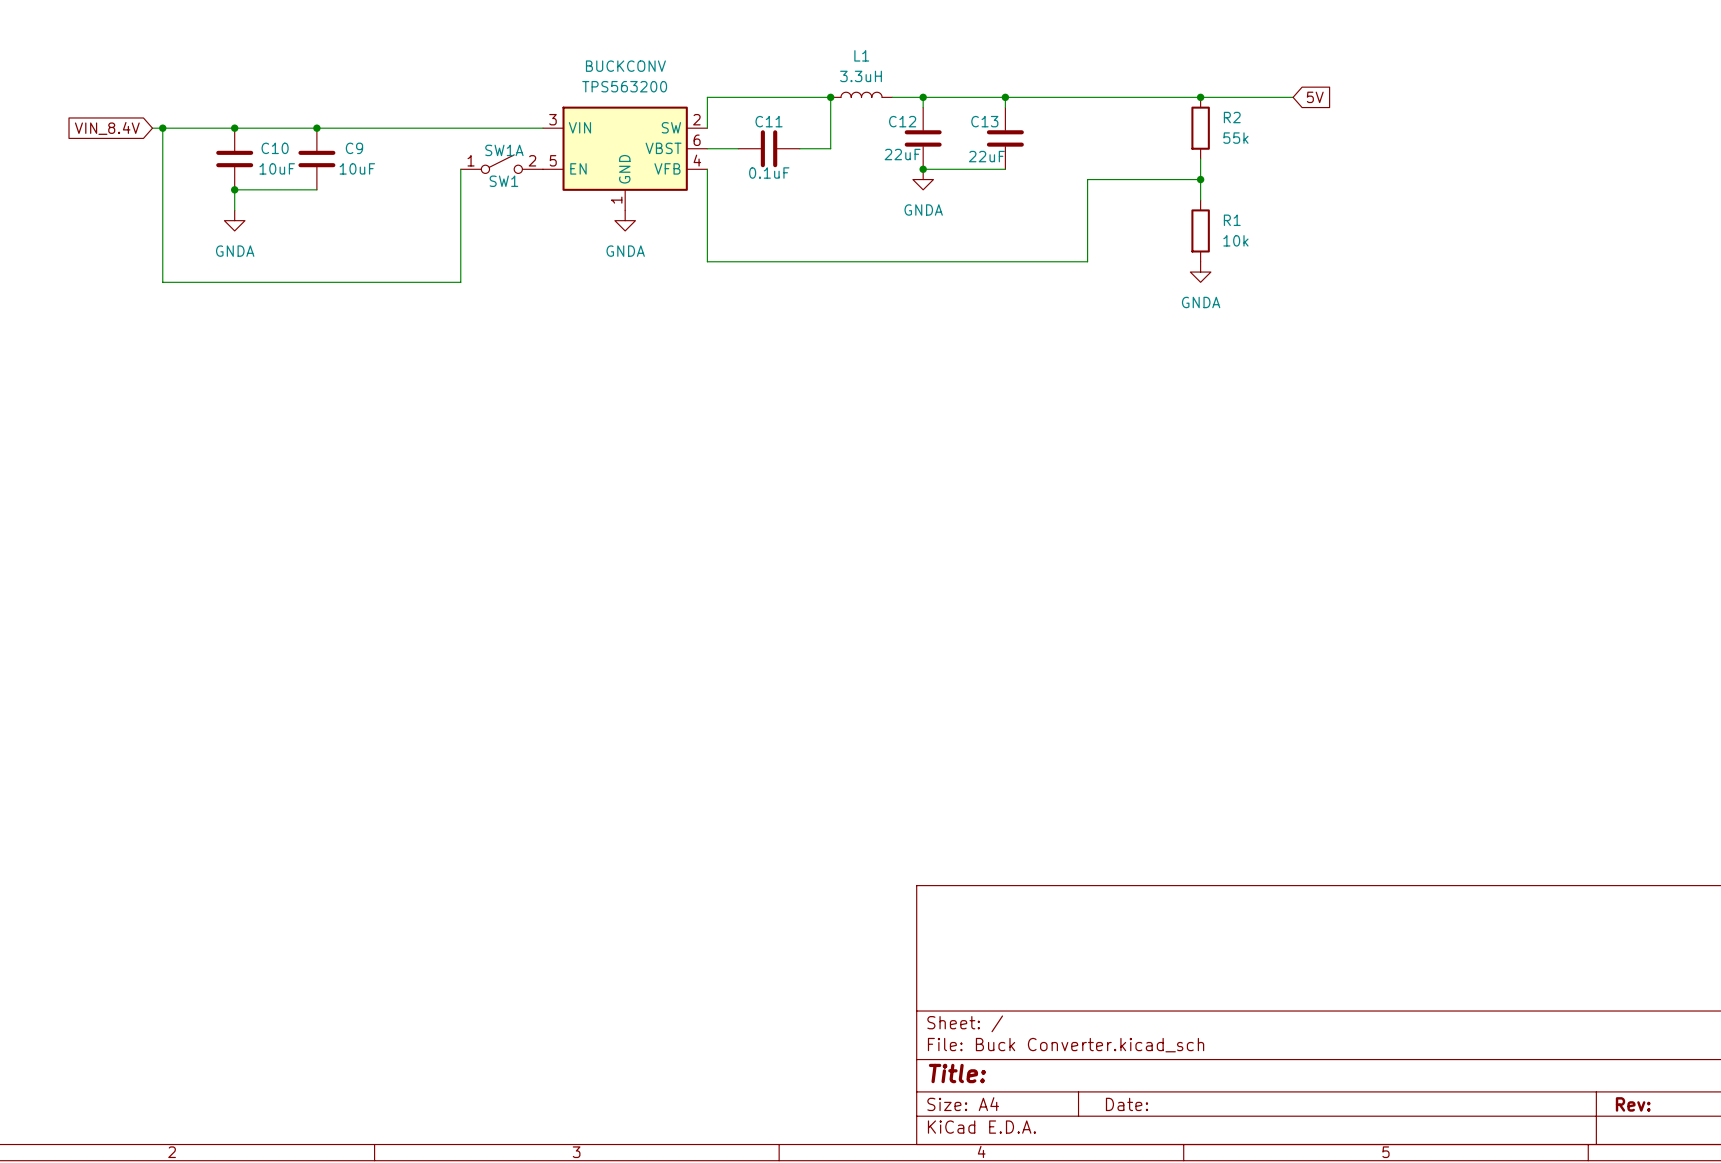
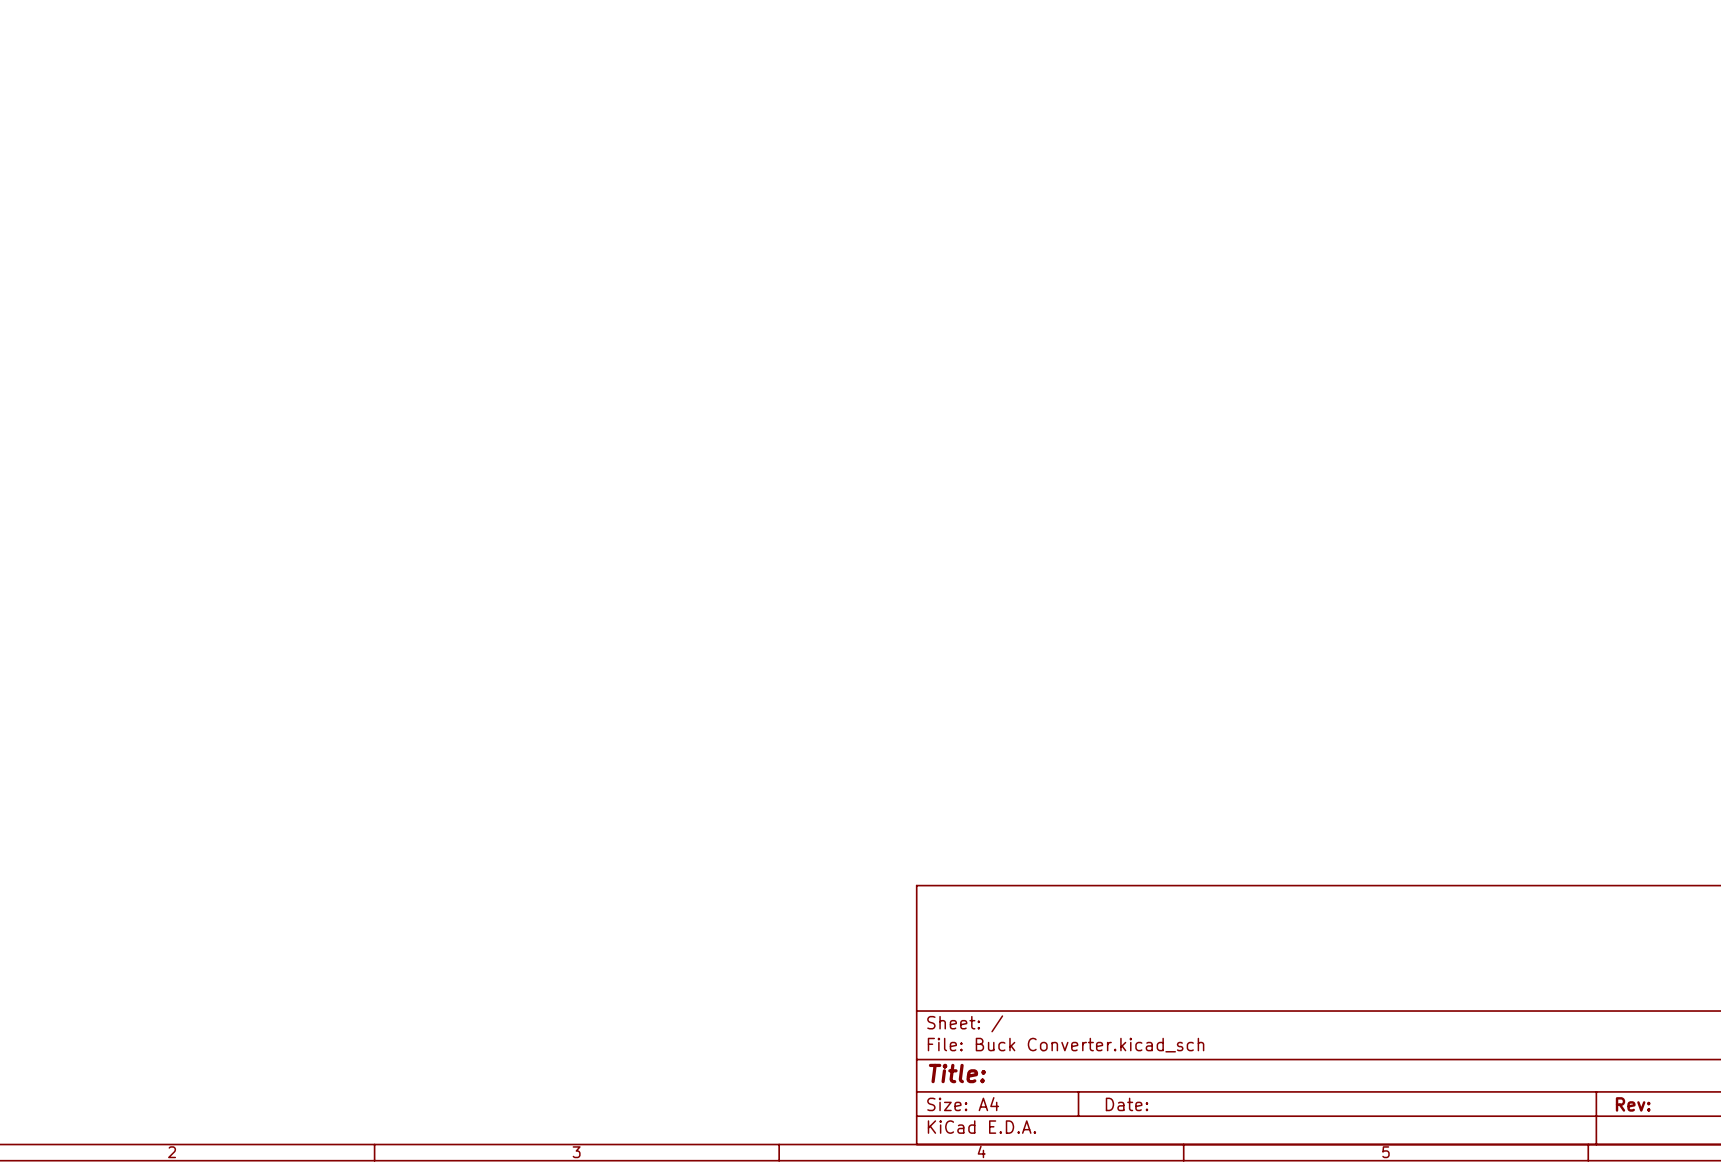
L1: 3.3uH (861, 94) -> none
junction: (830, 97) -> none
wire: (892, 97) (1293, 97) -> none
wire: (923, 97) (923, 107) -> none
junction: (923, 97) -> none
wire: (1005, 97) (1005, 107) -> none
junction: (1005, 97) -> none
junction: (1200, 97) -> none
global label: 5V (1315, 97) -> none
global label: VIN_8.4V (107, 128) -> none
wire: (152, 128) (542, 128) -> none
wire: (162, 128) (162, 282) (460, 282) (460, 169) -> none
junction: (162, 128) -> none
junction: (234, 128) -> none
junction: (316, 128) -> none
wire: (707, 128) (707, 97) (830, 97) (830, 148) (799, 148) -> none
R2: 55k (1200, 128) -> none
C12: 22uF (923, 138) -> none
C13: 22uF (1005, 138) -> none
wire: (707, 148) (738, 148) -> none
C11: 0.1uF (769, 148) -> none
BUCKCONV: TPS563200 (625, 158) -> none
C10: 10uF (234, 159) -> none
C9: 10uF (316, 159) -> none
wire: (1200, 159) (1200, 200) -> none
SW1A: SW1 (501, 164) -> none
wire: (707, 169) (707, 261) (1087, 261) (1087, 179) (1200, 179) -> none
wire: (923, 169) (1005, 169) -> none
junction: (923, 169) -> none
power symbol: GNDA (923, 179) -> none
junction: (1200, 179) -> none
junction: (234, 189) -> none
wire: (316, 189) (234, 189) (234, 210) -> none
power symbol: GNDA (234, 220) -> none
power symbol: GNDA (625, 220) -> none
R1: 10k (1200, 230) -> none
power symbol: GNDA (1200, 272) -> none

